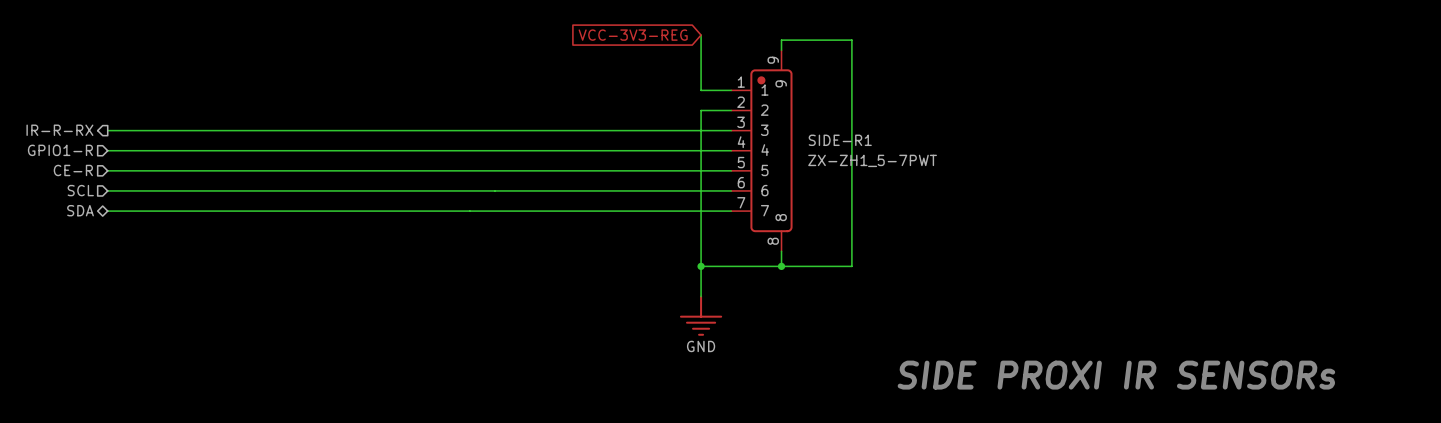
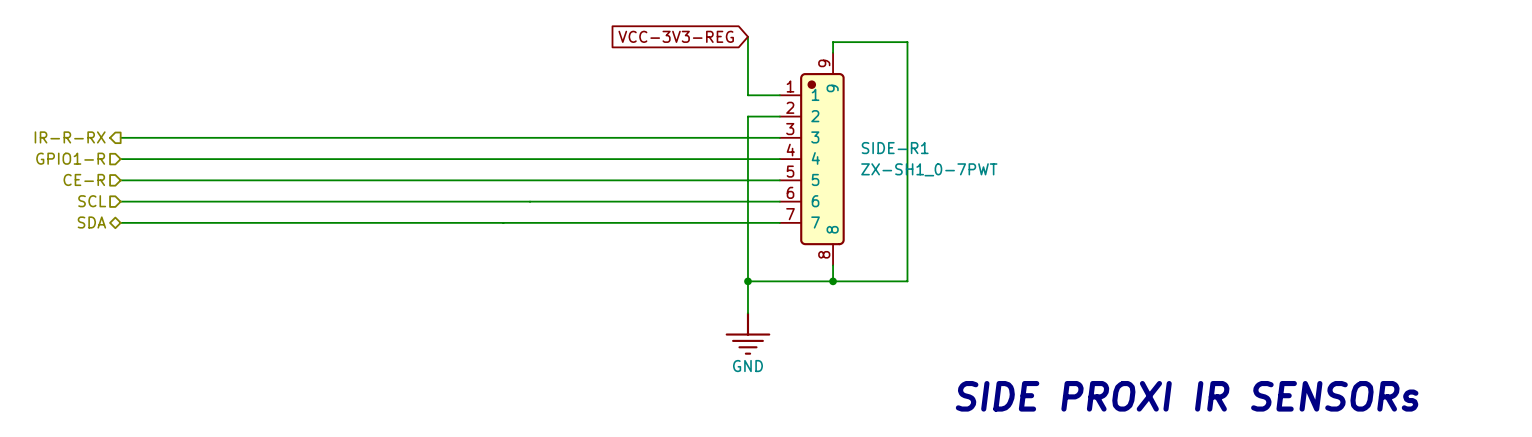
SIDE-R1 value: ZX-ZH1_5-7PWT (872, 160) -> ZX-SH1_0-7PWT (929, 169)

